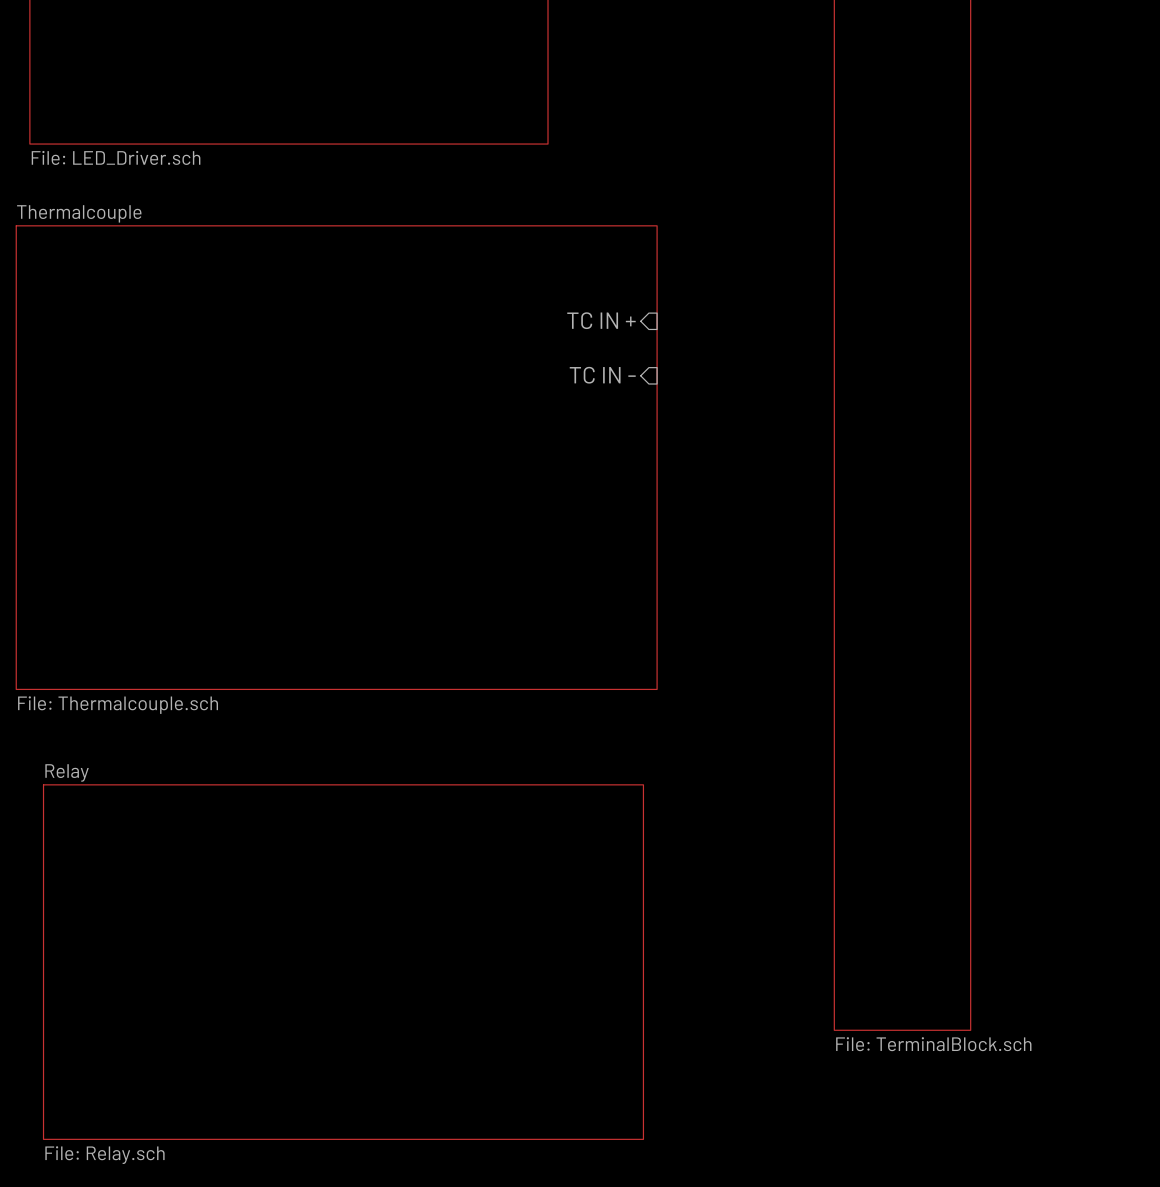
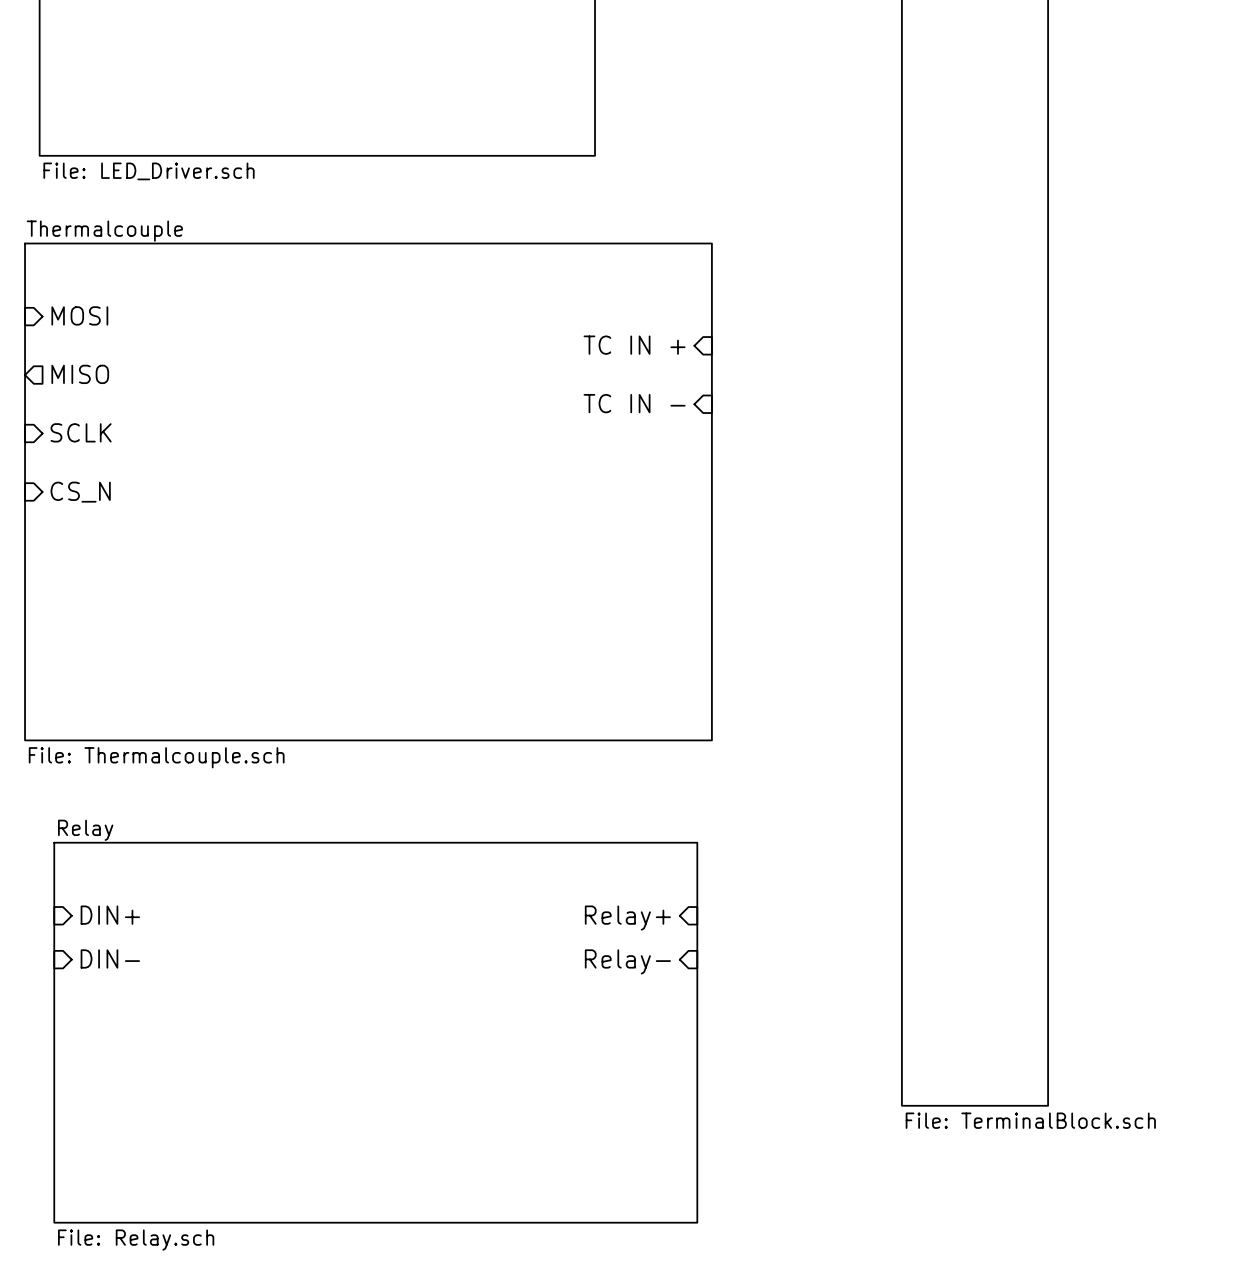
sheet pin: none -> MOSI (79, 315)
sheet pin: none -> MISO (80, 374)
sheet pin: none -> SCLK (81, 432)
sheet pin: none -> CS_N (80, 492)
sheet pin: none -> DIN+ (110, 915)
sheet pin: none -> Relay+ (627, 918)
sheet pin: none -> DIN- (110, 958)
sheet pin: none -> Relay- (627, 961)

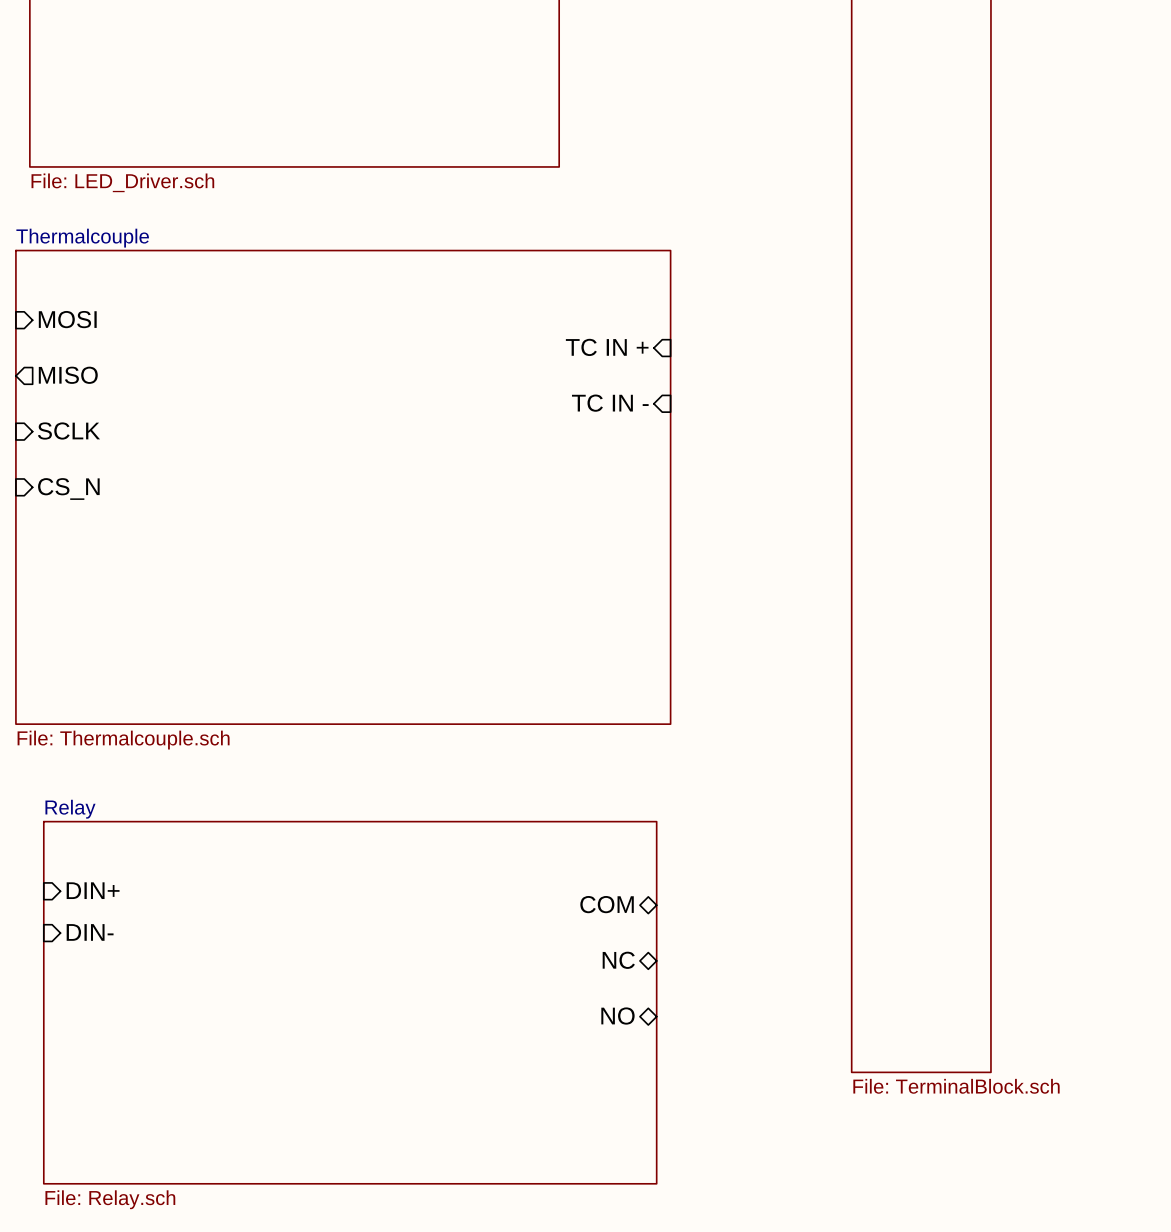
sheet pin: Relay+ (627, 918) -> none
sheet pin: none -> COM (607, 904)
sheet pin: Relay- (627, 961) -> none
sheet pin: none -> NC (618, 960)
sheet pin: none -> NO (617, 1016)

